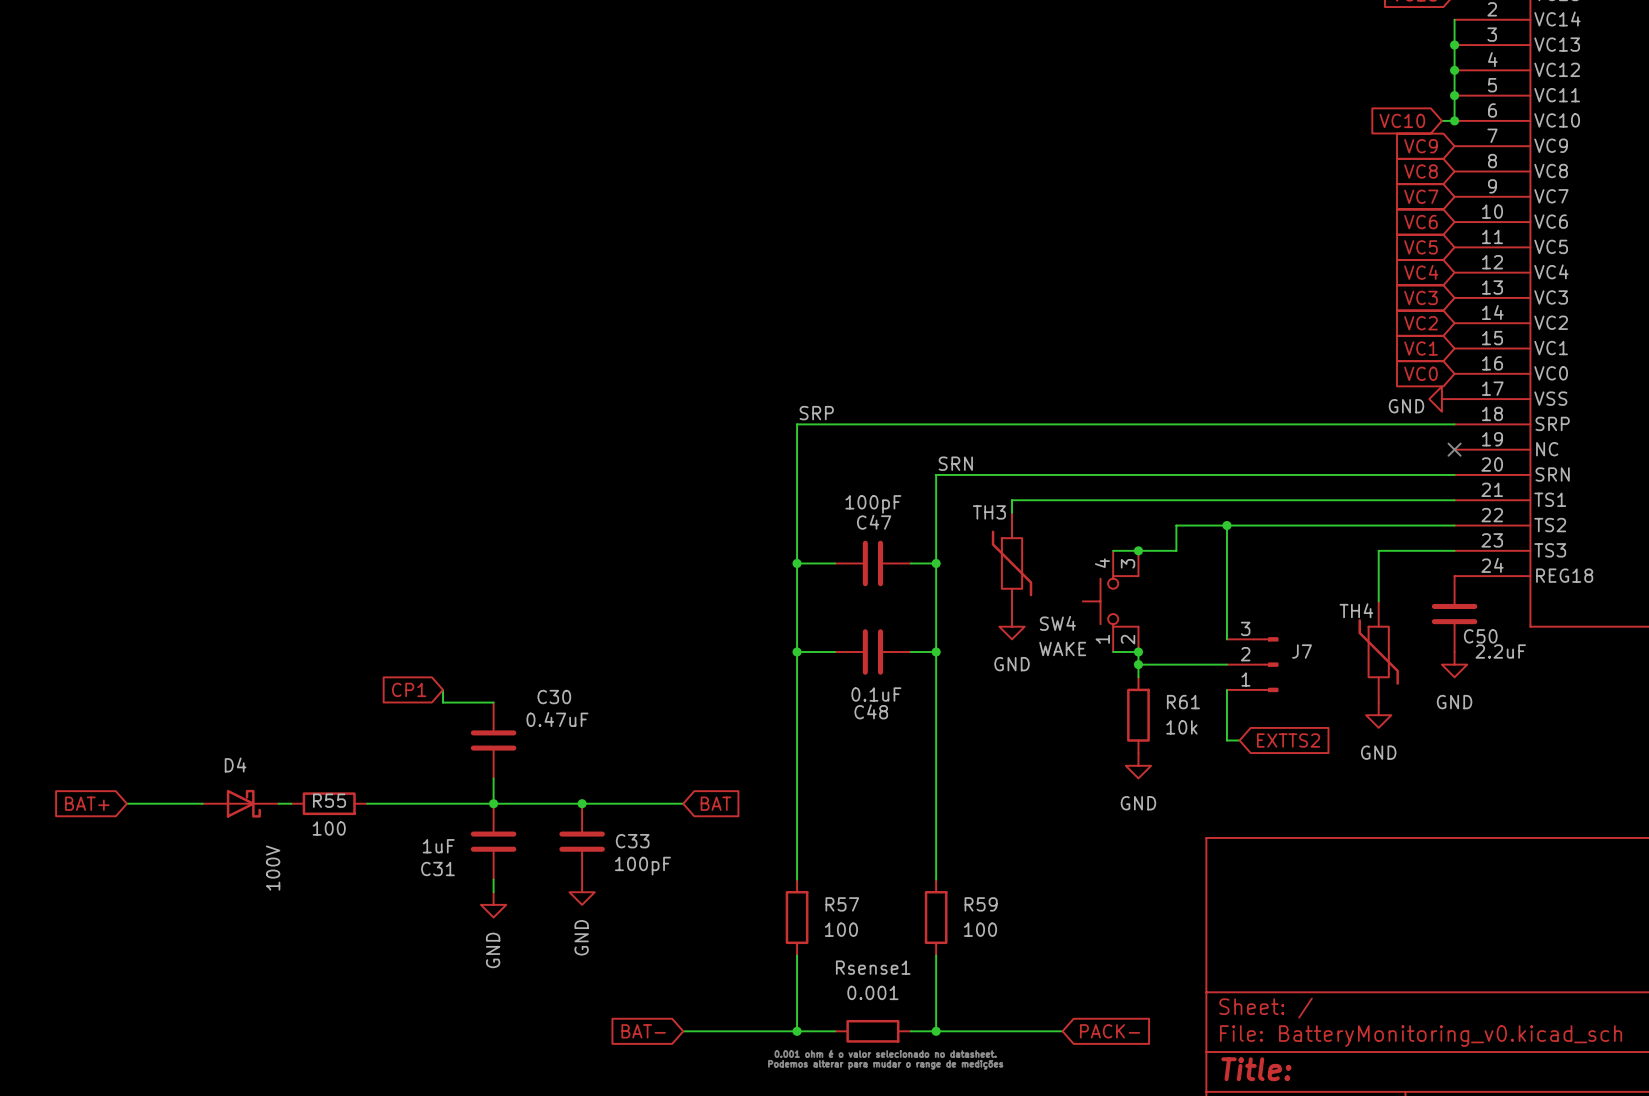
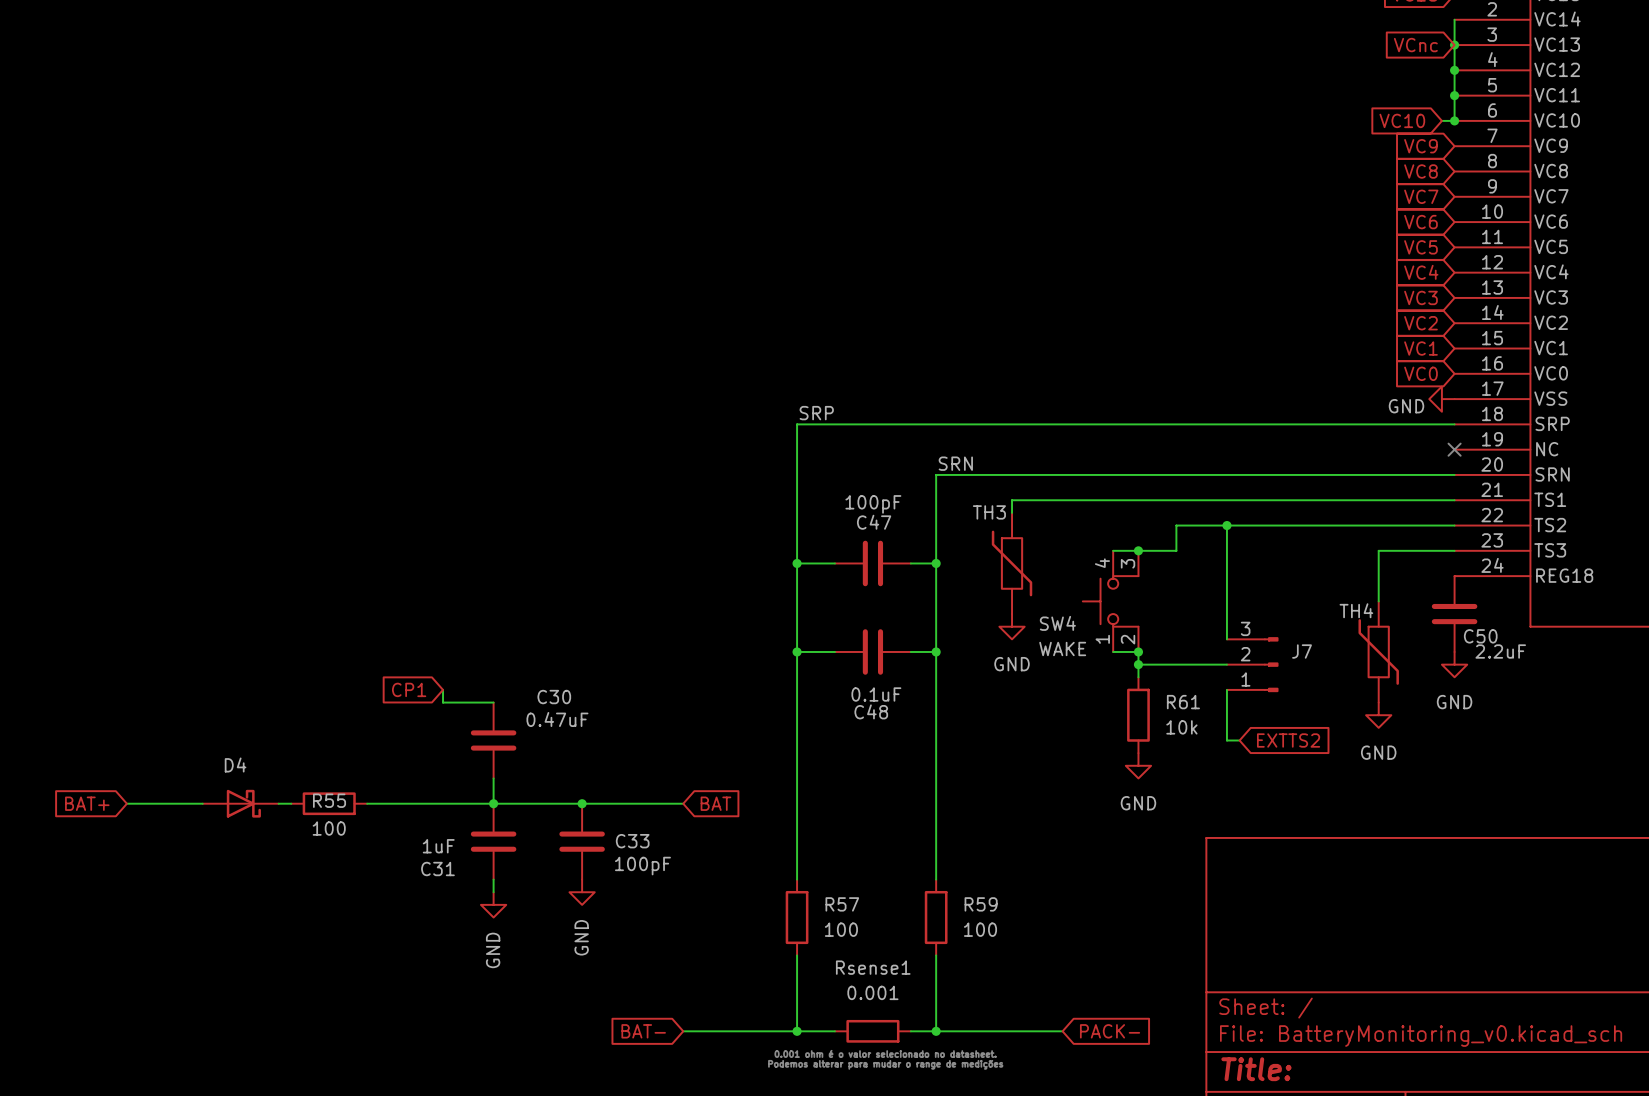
global label: none -> VCnc (1415, 45)
D4 value: 100V (273, 868) -> none

